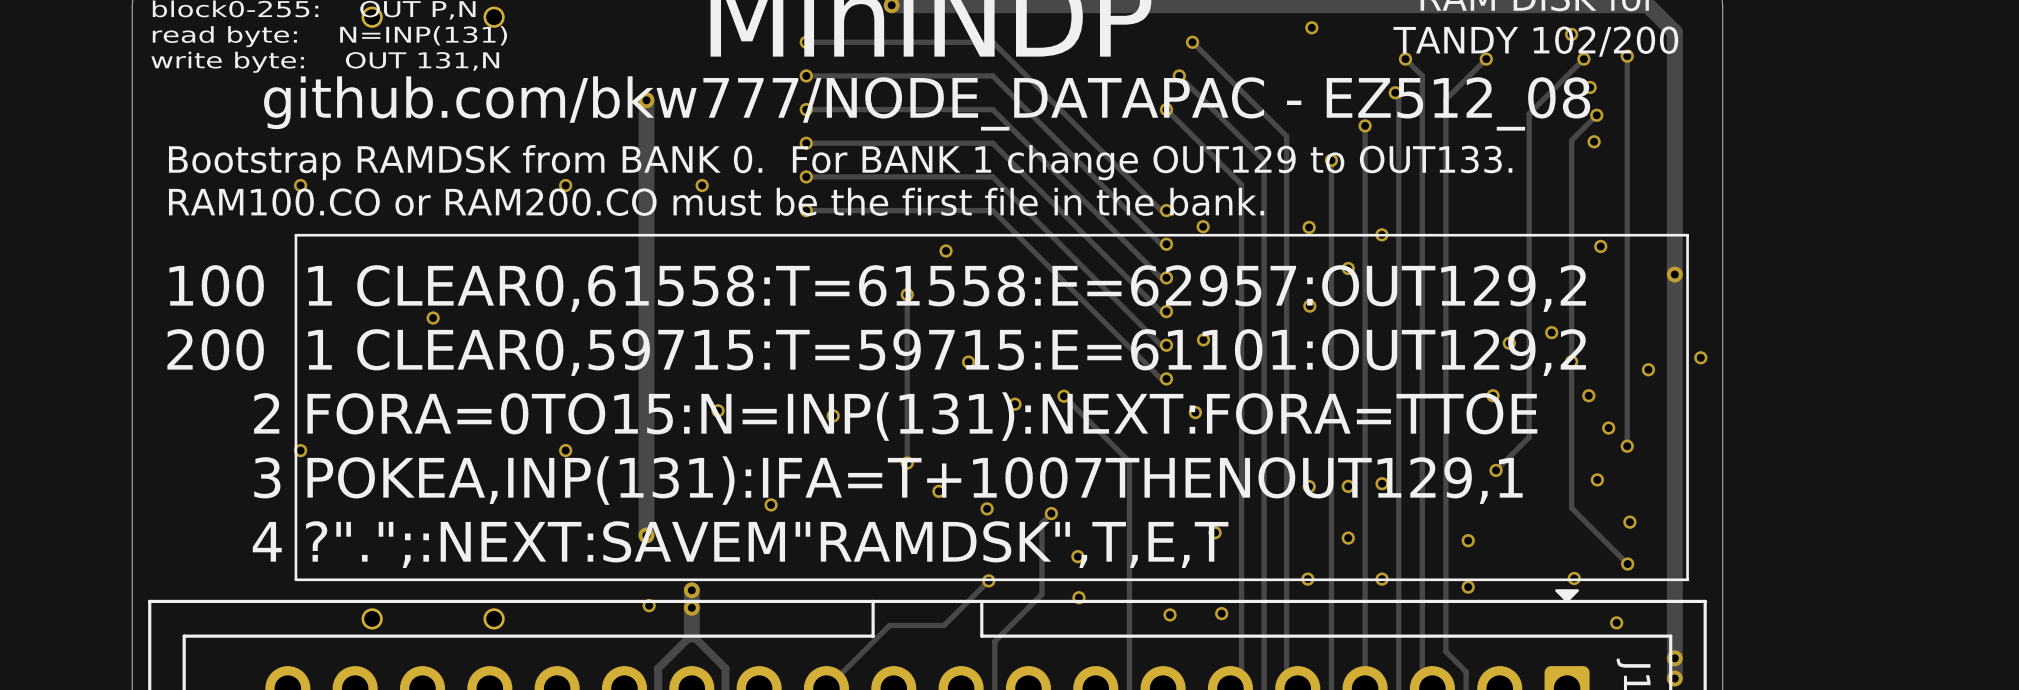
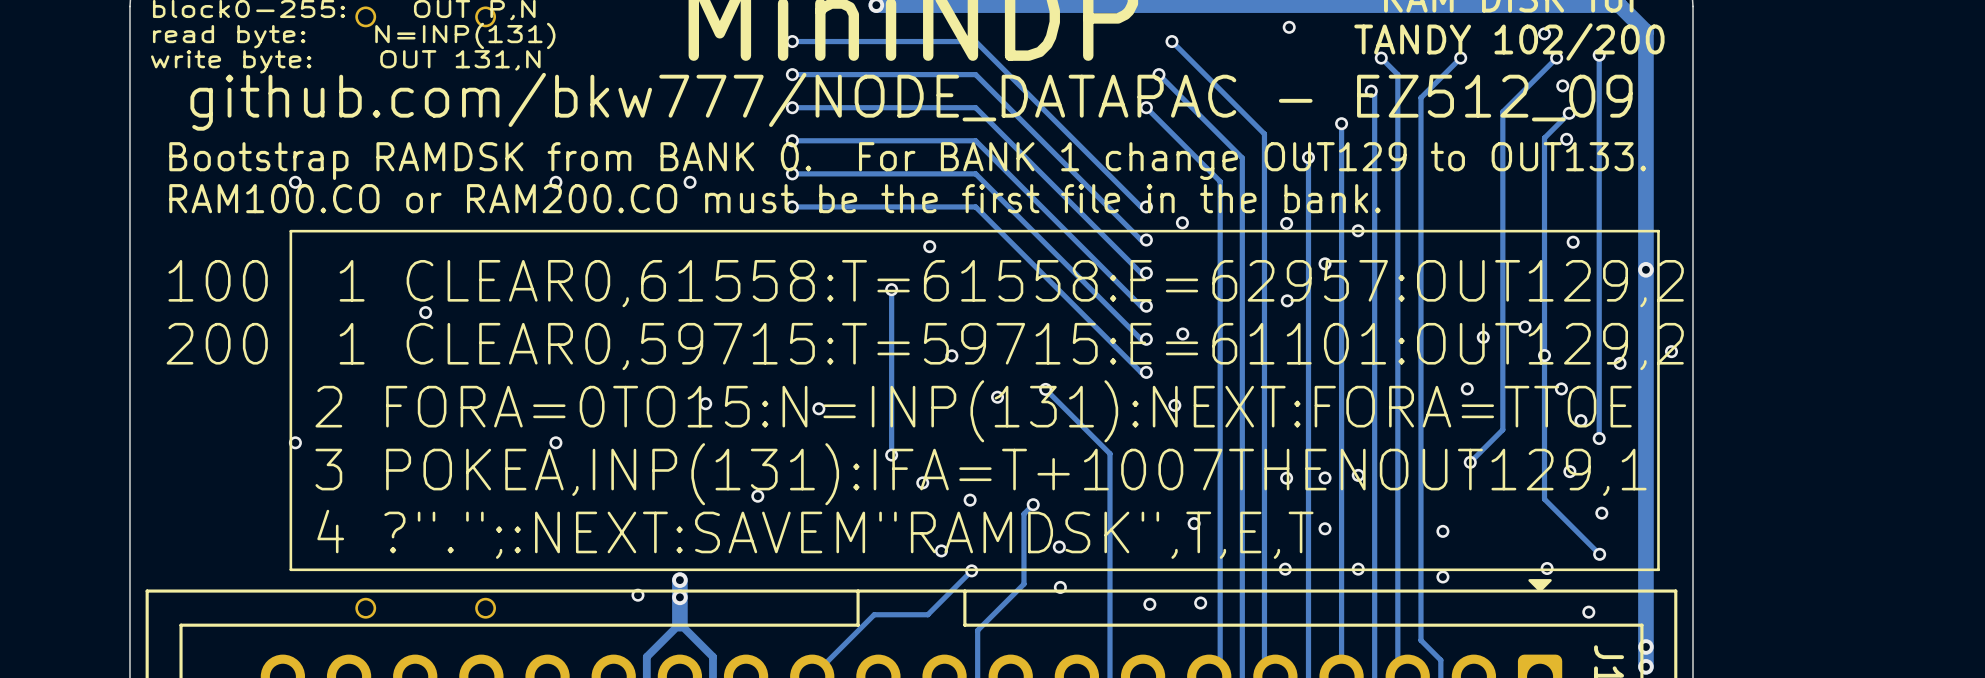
track: (646, 100) (646, 535) -> none
via: (646, 100) -> none
text: github.com/bkw777/NODE_DATAPAC - EZ512_08 (927, 103) -> github.com/bkw777/NODE_DATAPAC - EZ512_09 (911, 101)
via: (646, 535) -> none
via: none -> (941, 550)

